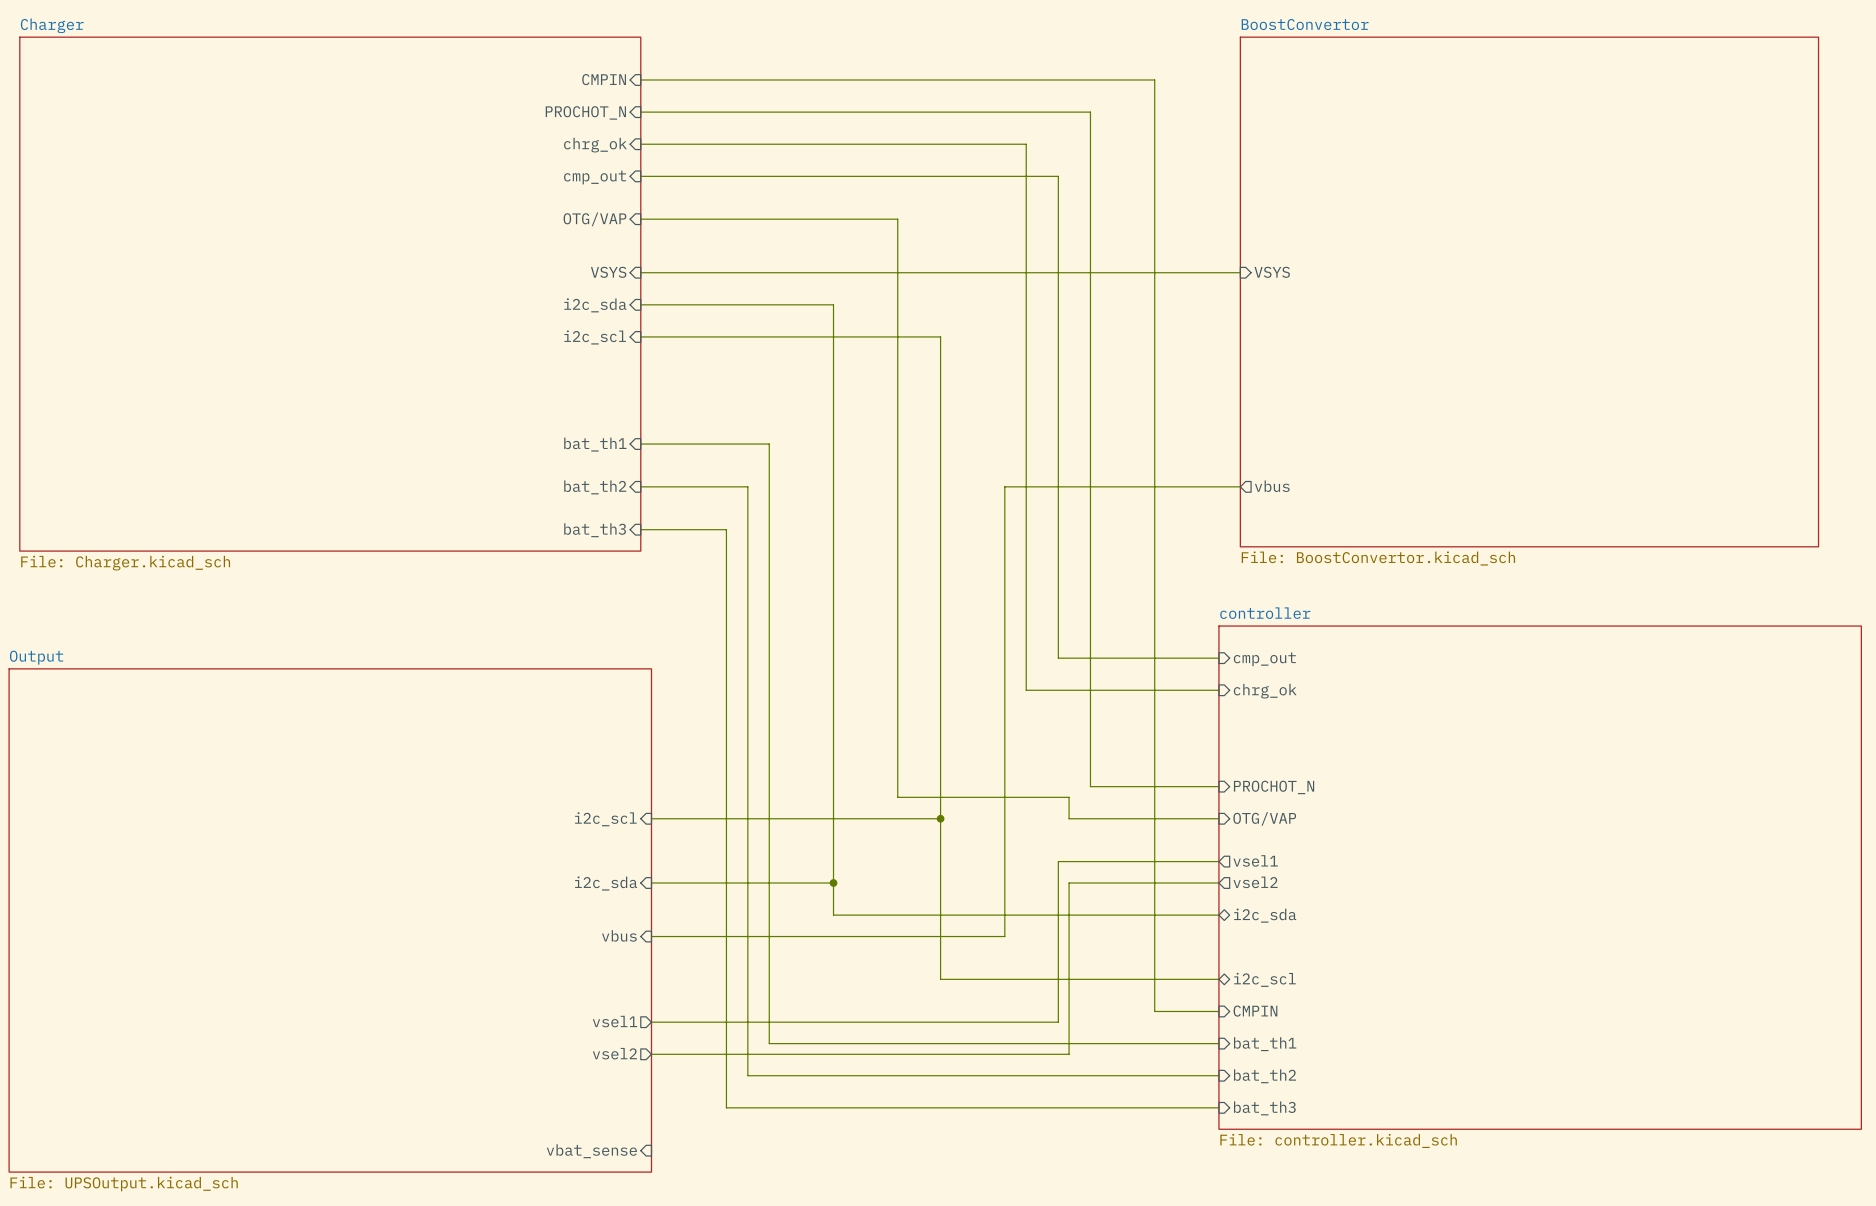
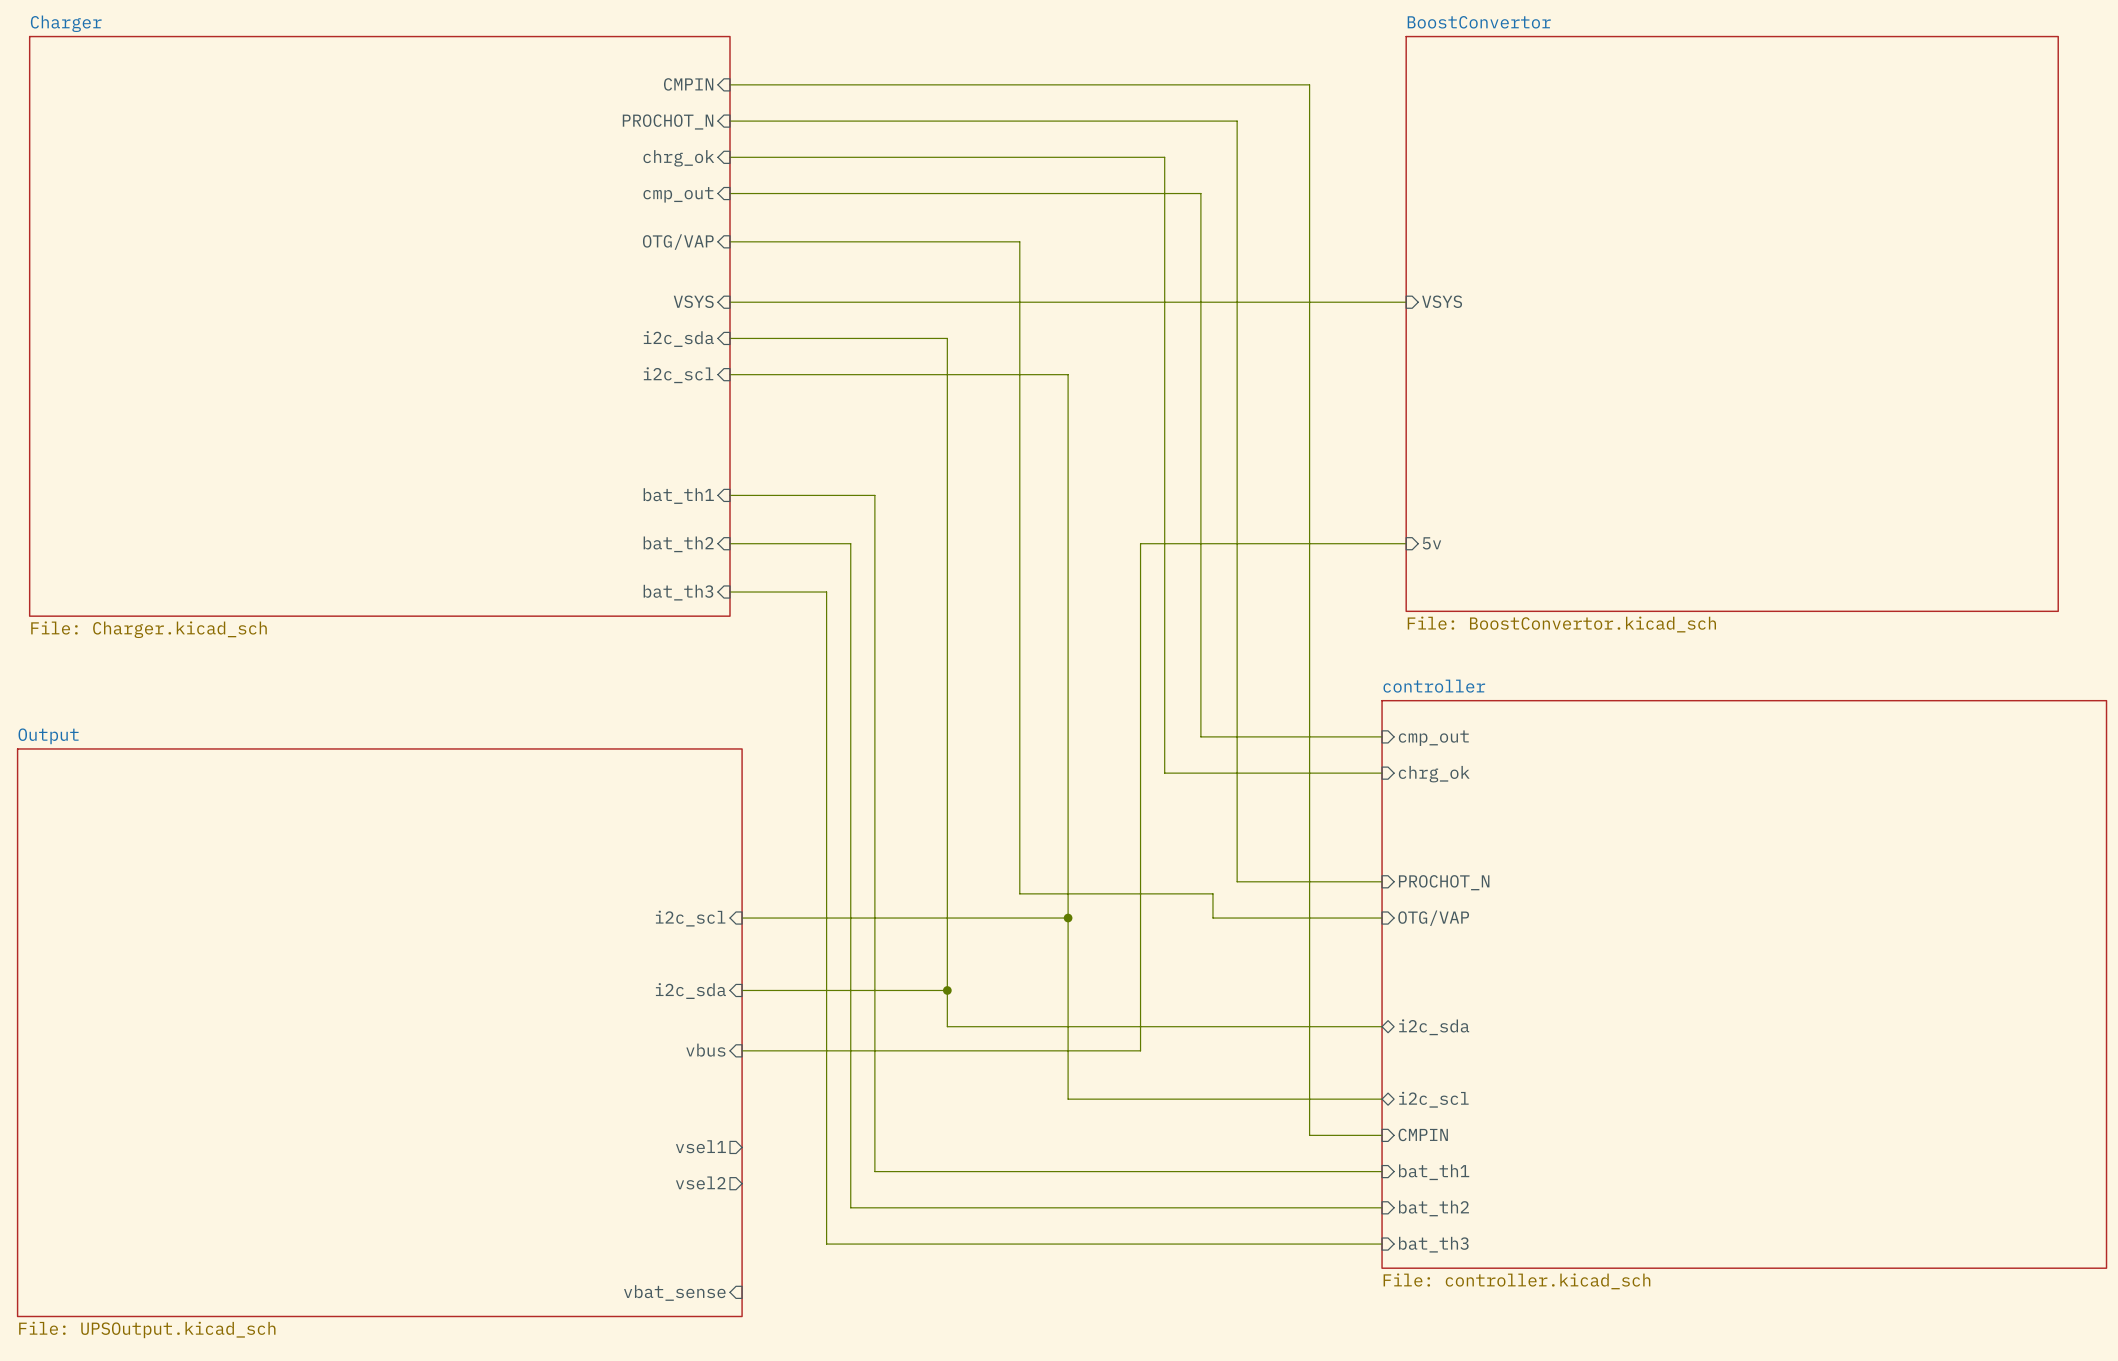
sheet pin shape: output (1272, 486) -> input (1431, 543)
sheet pin: vbus (1272, 486) -> 5v (1431, 543)
sheet pin: vsel1 (1255, 860) -> none
wire: (1218, 861) (1058, 861) (1058, 1022) (651, 1022) -> none
wire: (1218, 882) (1069, 882) (1069, 1054) (651, 1054) -> none
sheet pin: vsel2 (1255, 882) -> none

